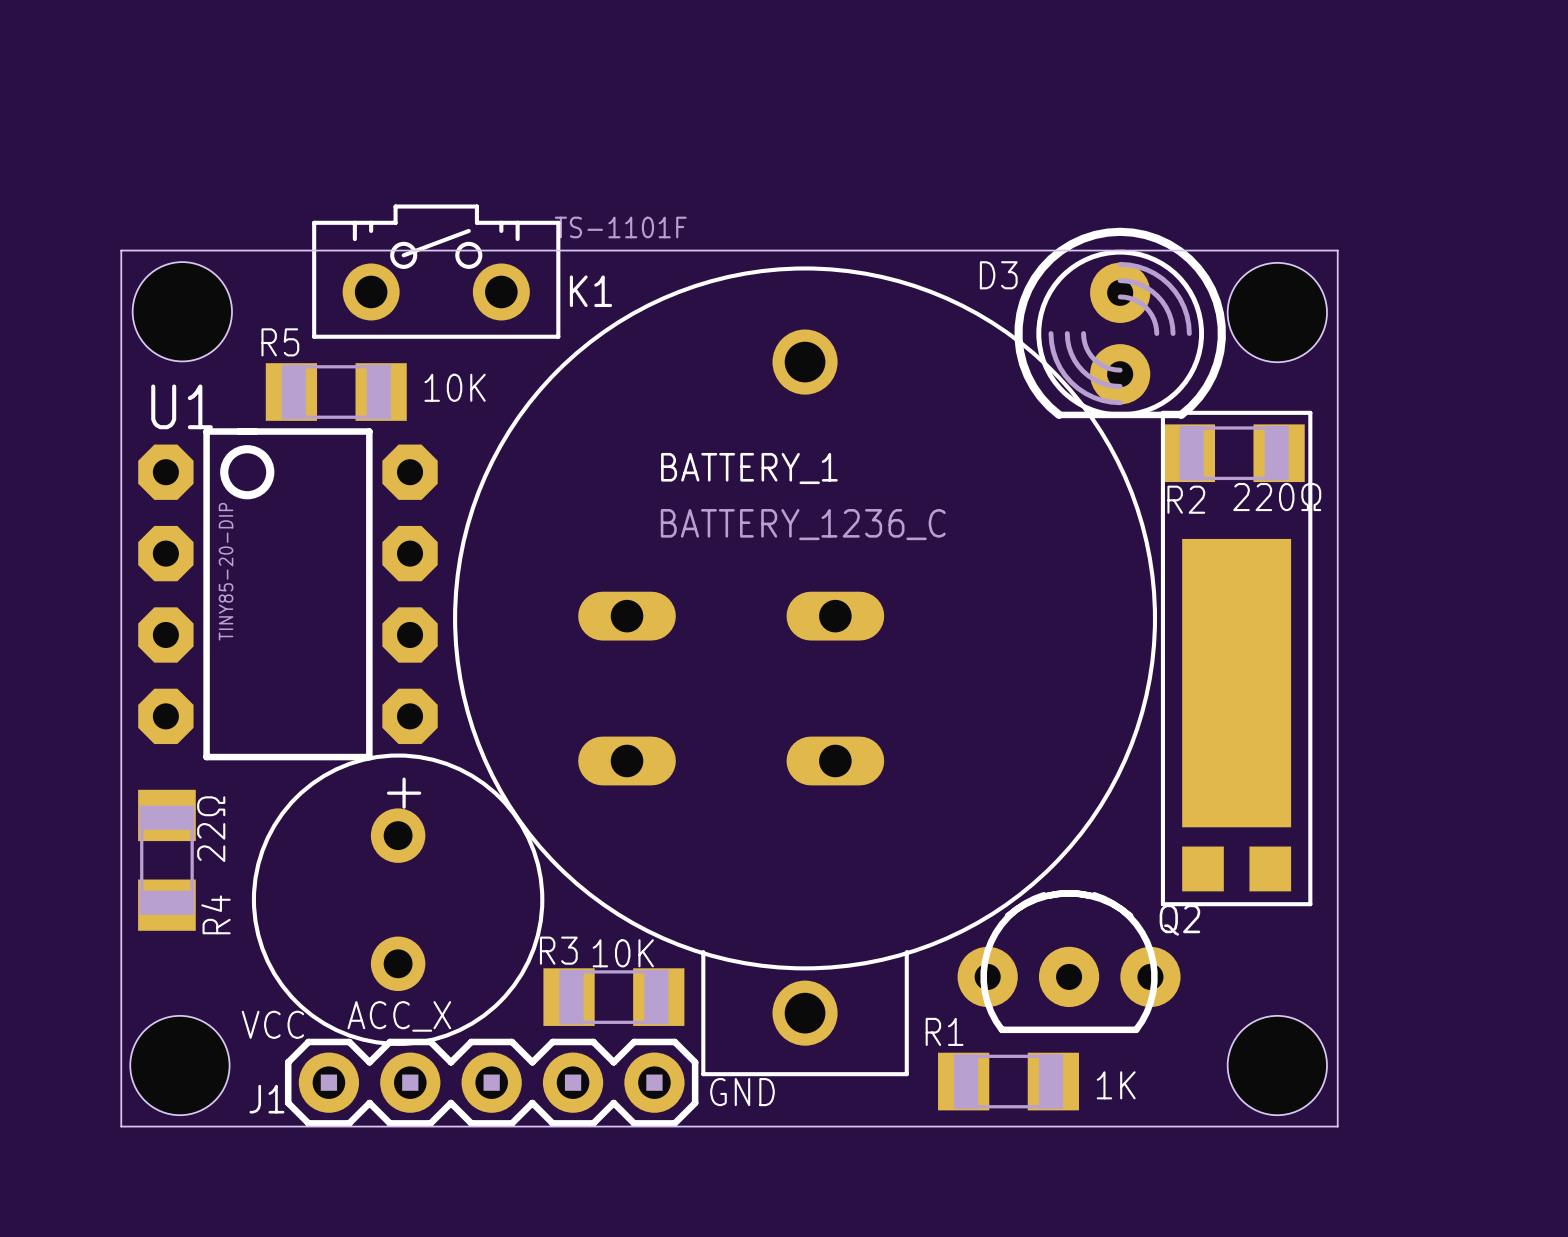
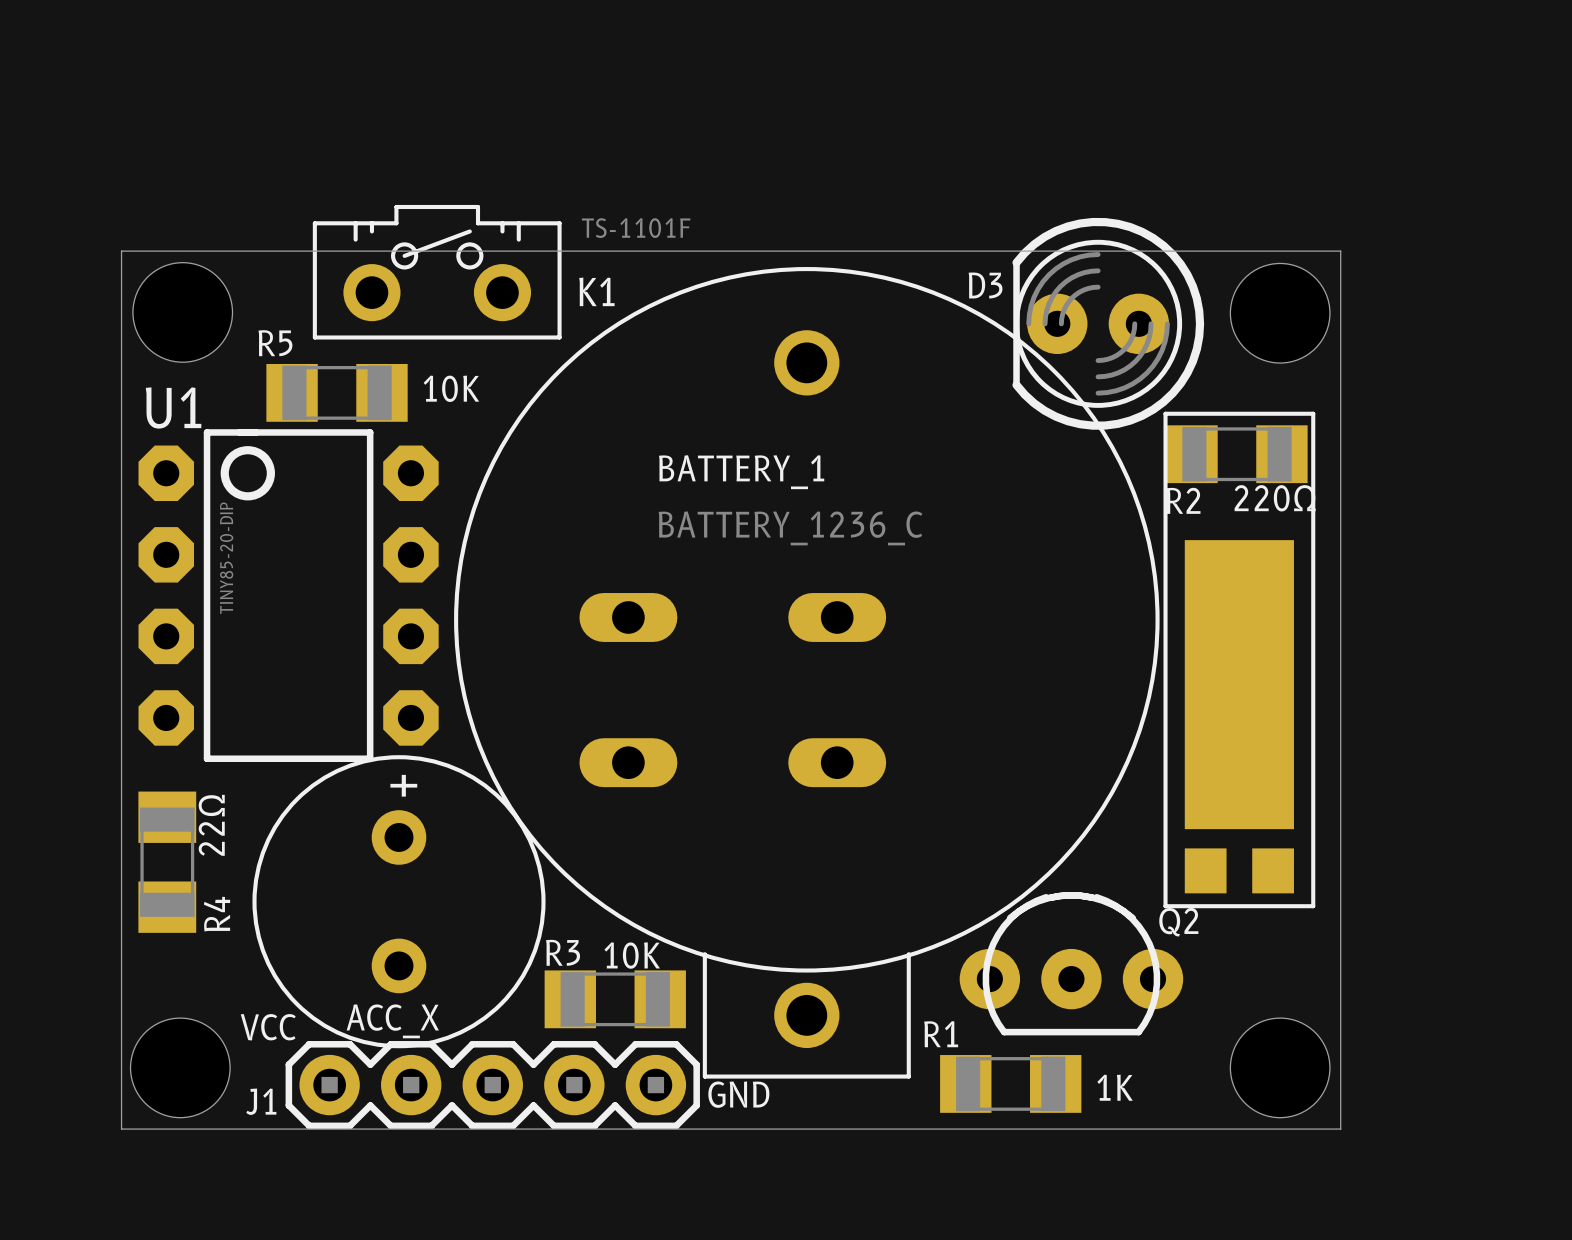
D3 rotation: 0° (1120, 323) -> 90° clockwise (1108, 323)

